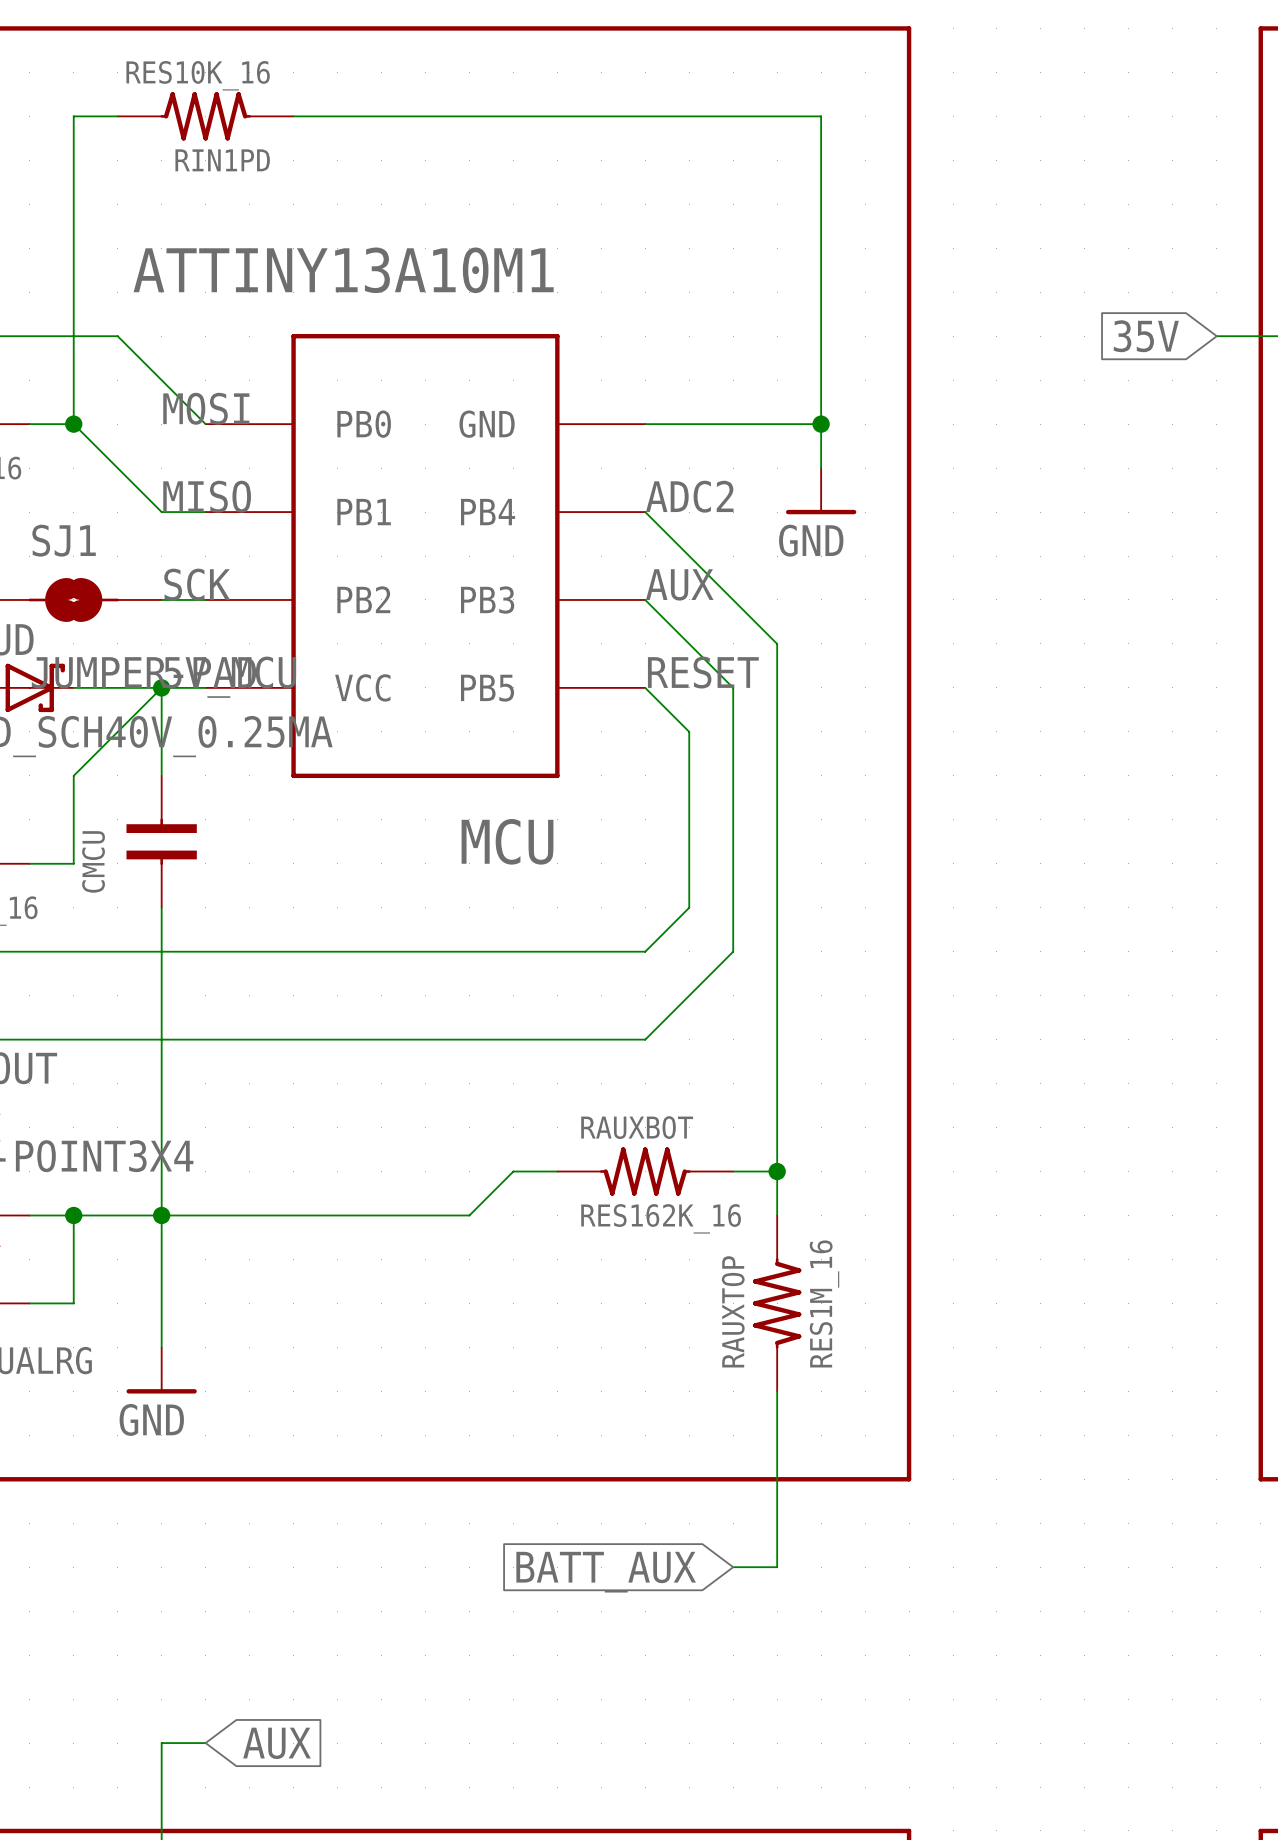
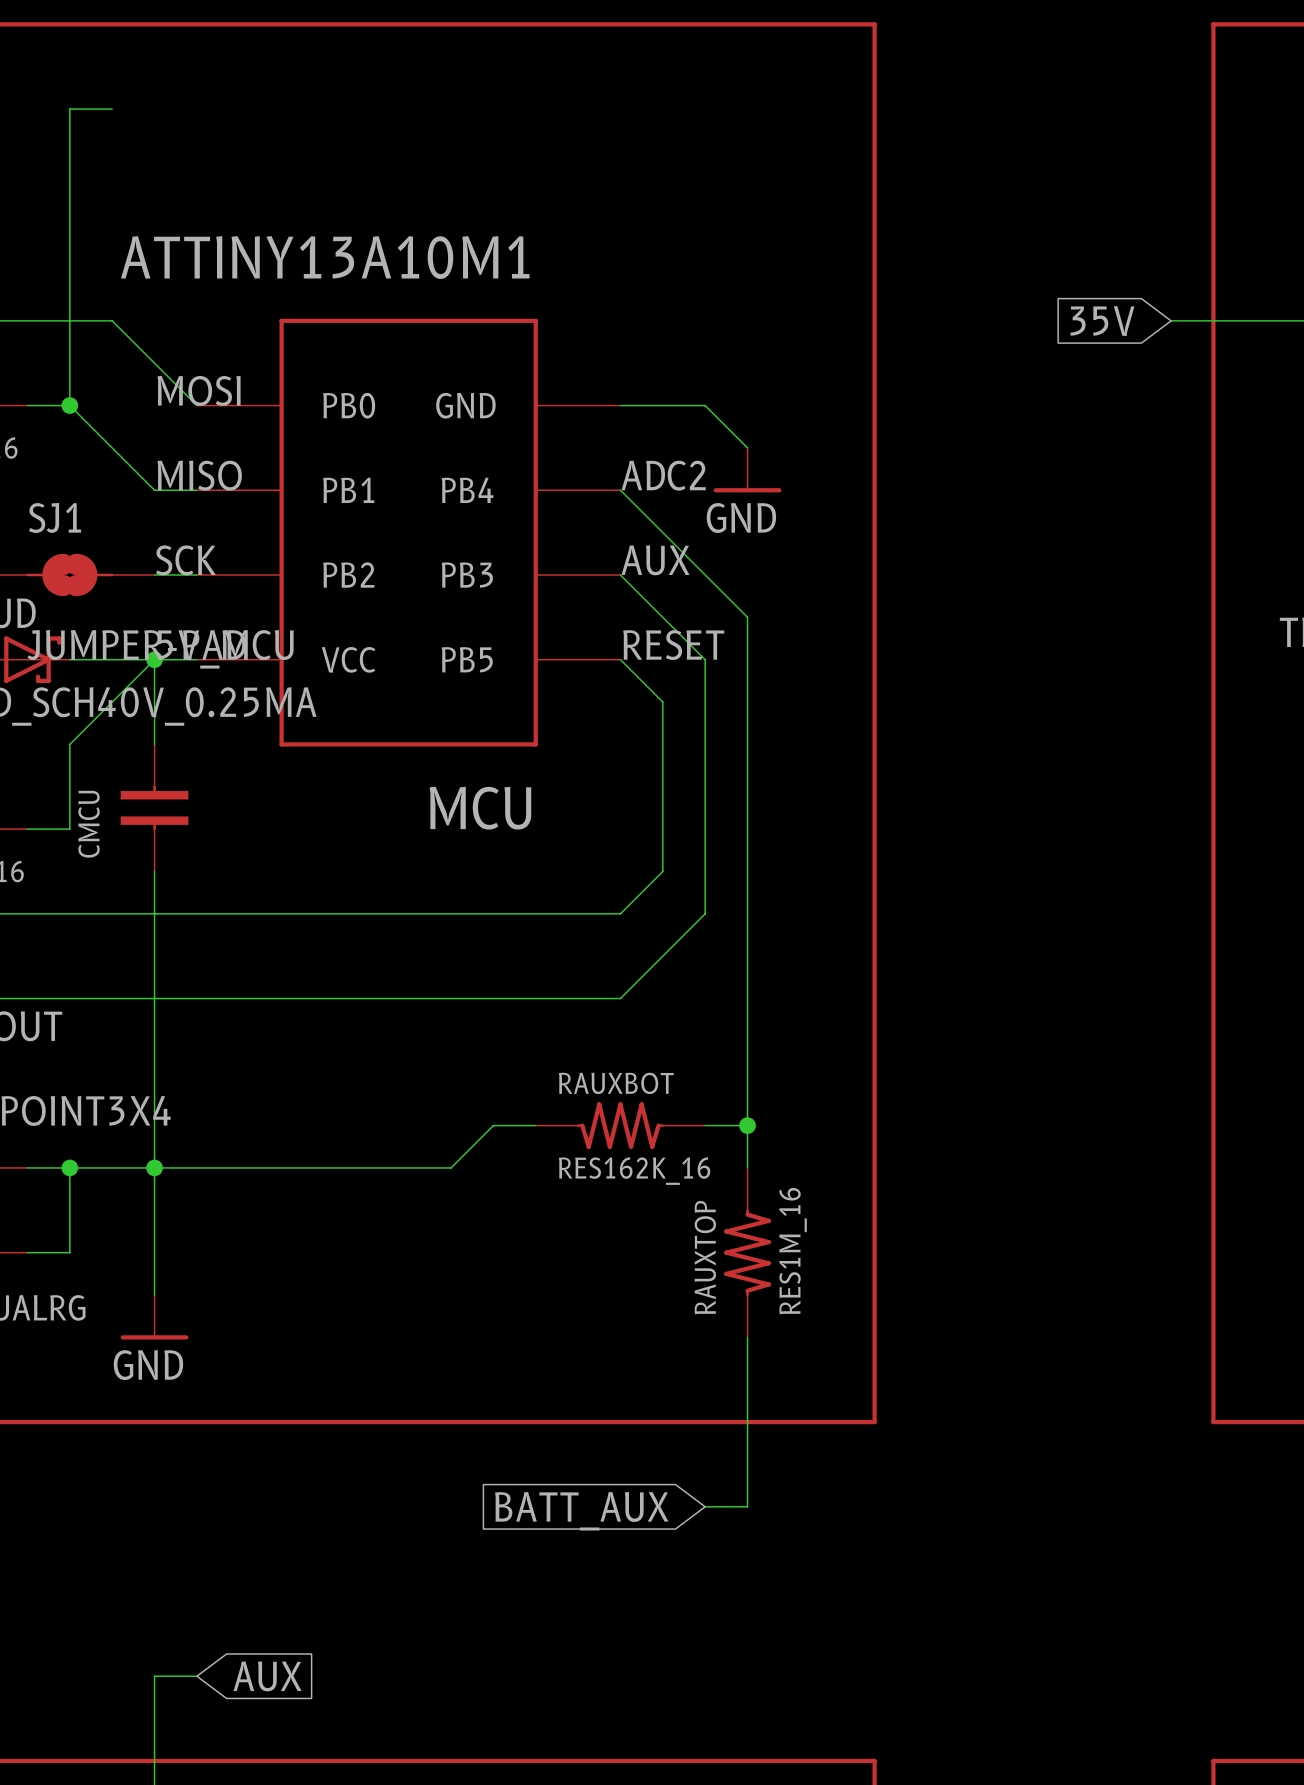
RIN1PD: RES10K_16 (205, 116) -> none
wire: (293, 116) (821, 116) (821, 468) -> none
wire: (733, 424) (821, 424) -> (705, 405) (747, 447)
junction: (821, 424) -> none
power symbol position: GND (821, 491) -> GND (747, 470)

